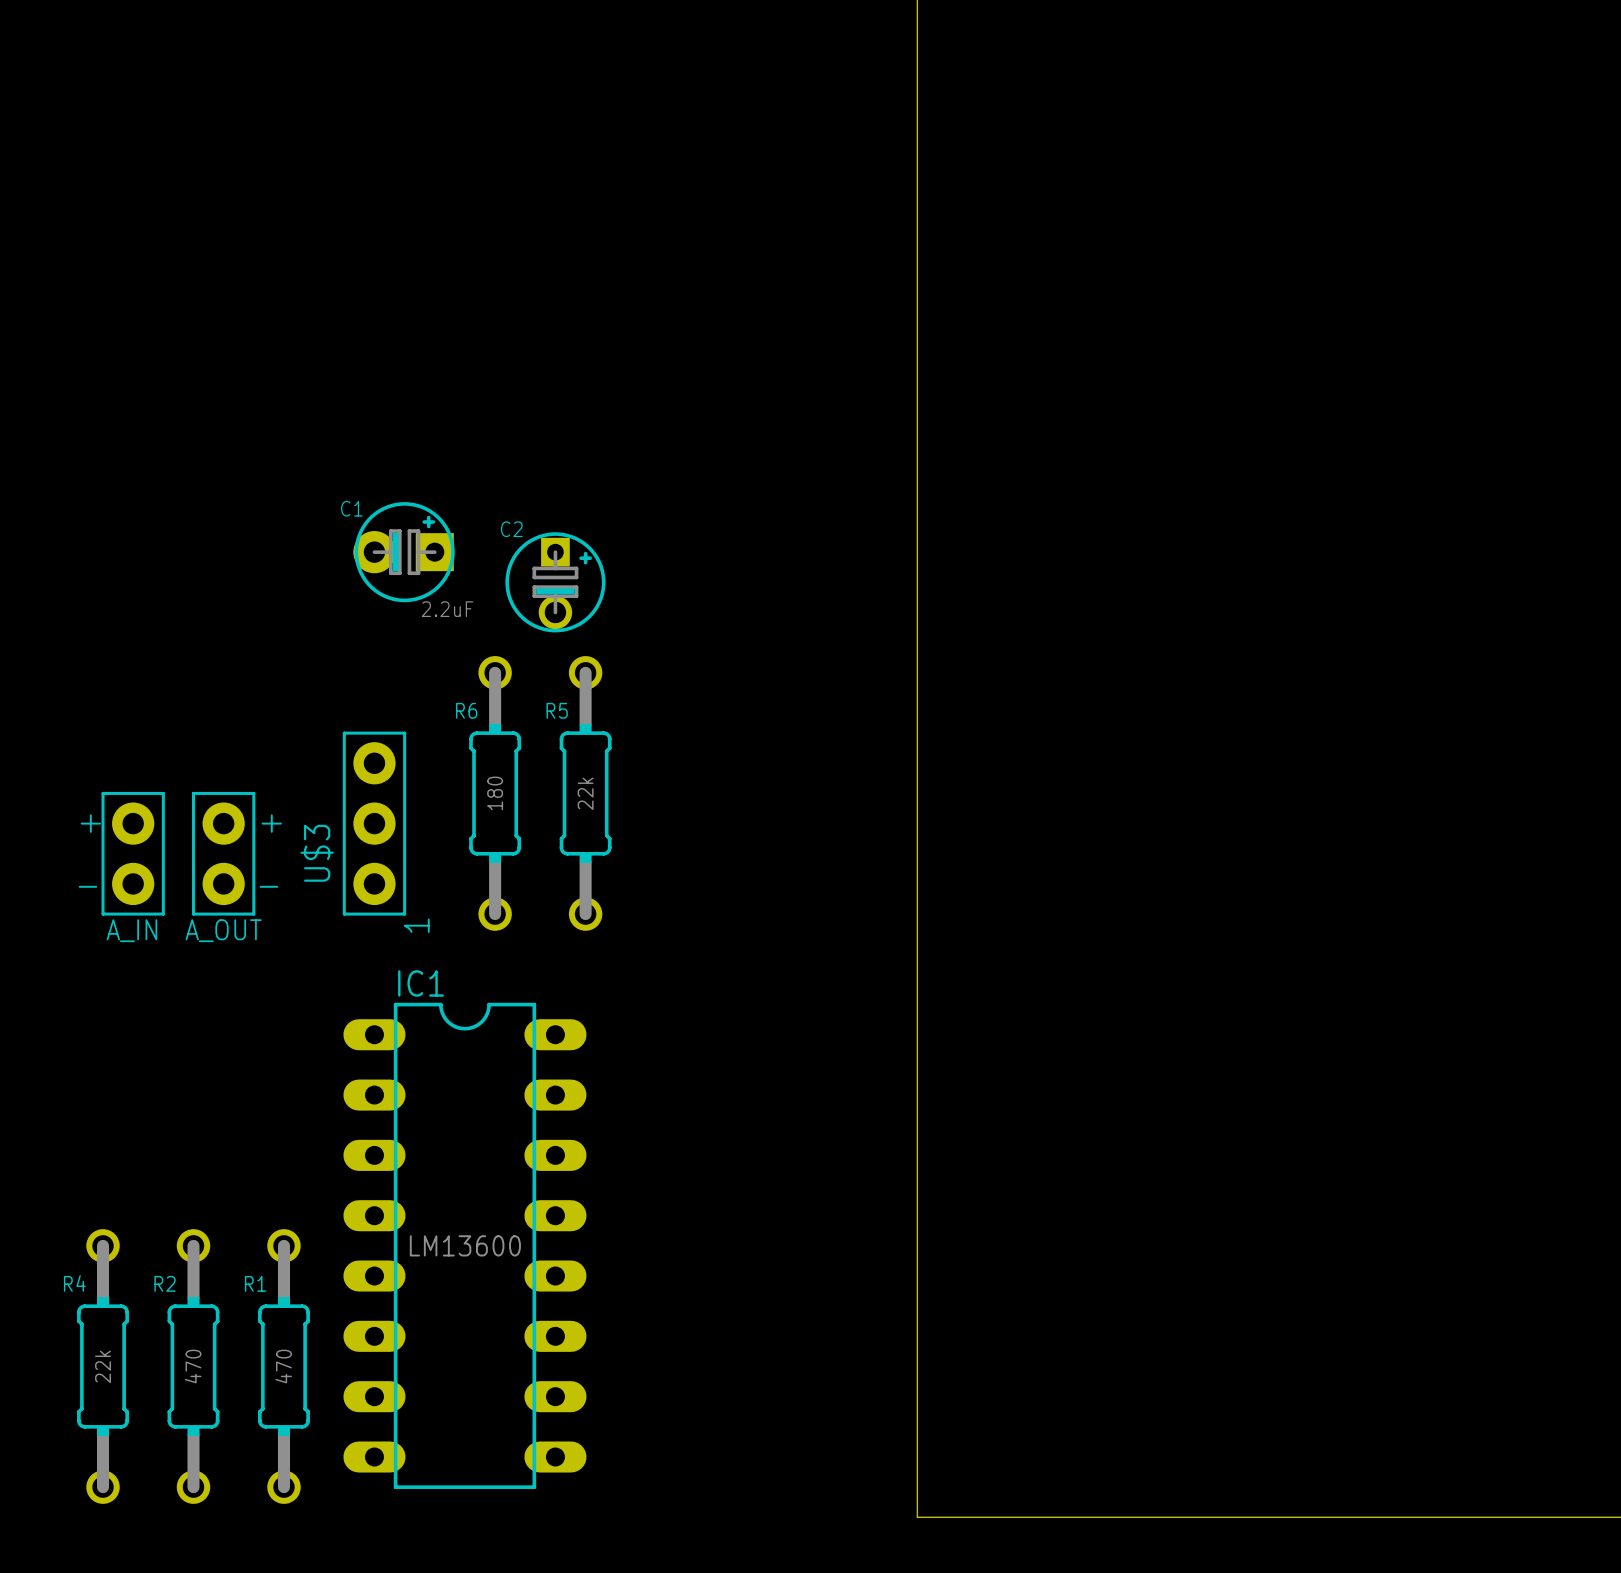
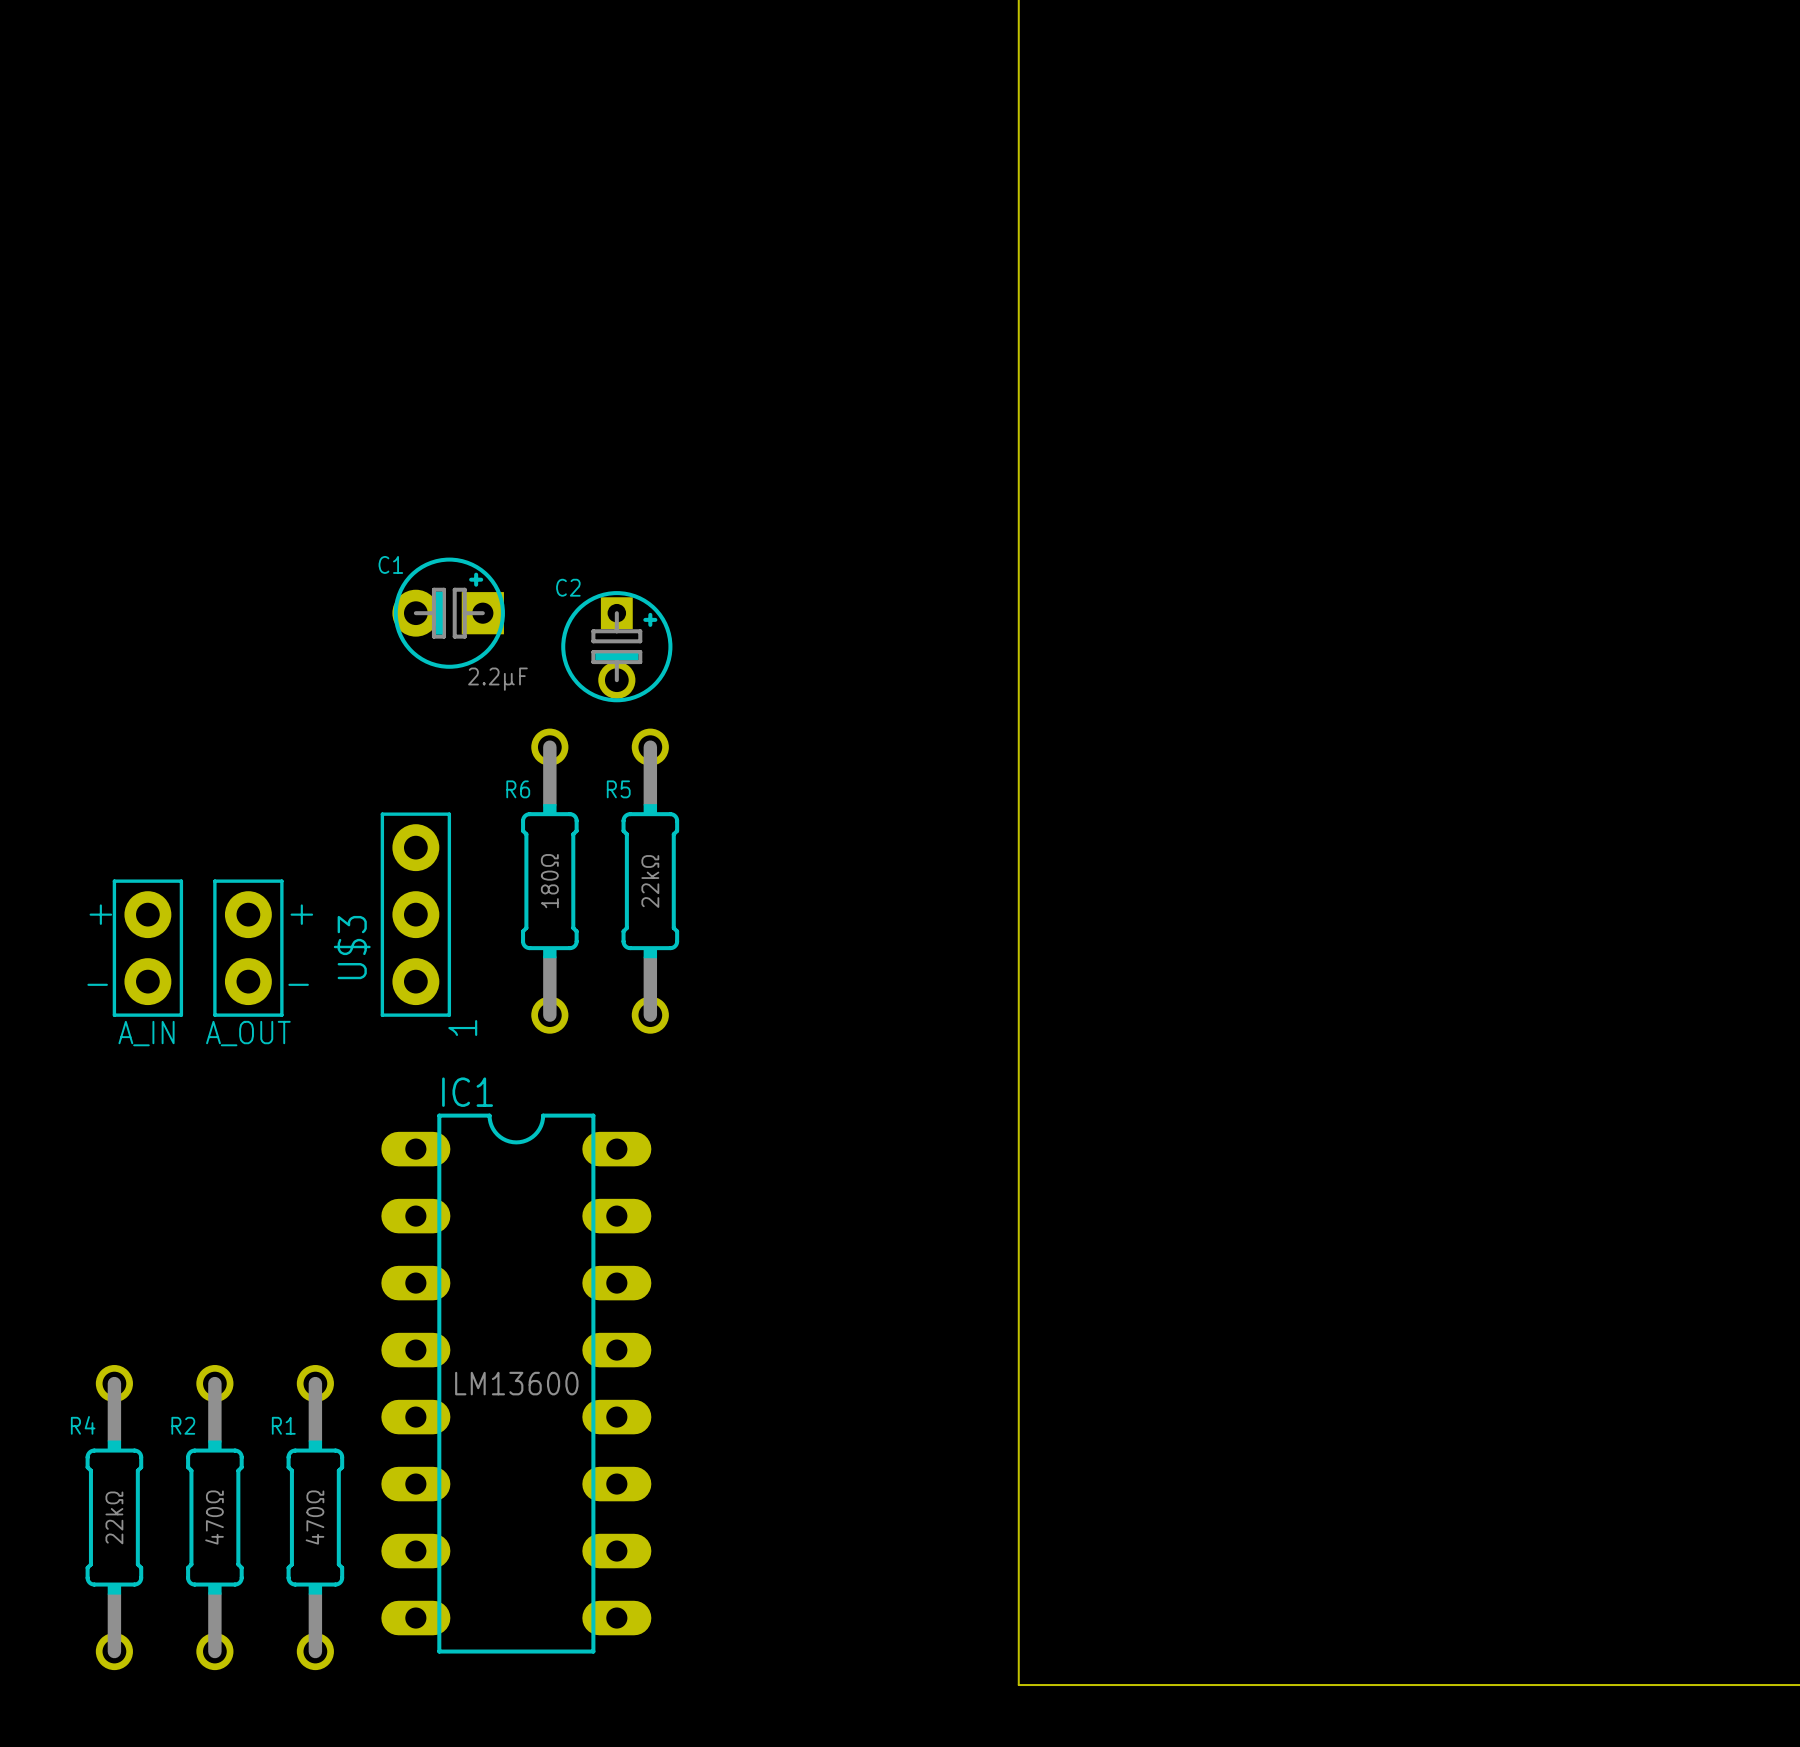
C1 value: 2.2uF (447, 609) -> 2.2μF (497, 679)
R6 value: 180 (495, 793) -> 180Ω (549, 881)
R5 value: 22k (585, 793) -> 22kΩ (650, 881)
R4 value: 22k (103, 1366) -> 22kΩ (114, 1517)
R2 value: 470 (193, 1366) -> 470Ω (214, 1517)
R1 value: 470 (283, 1366) -> 470Ω (314, 1517)

